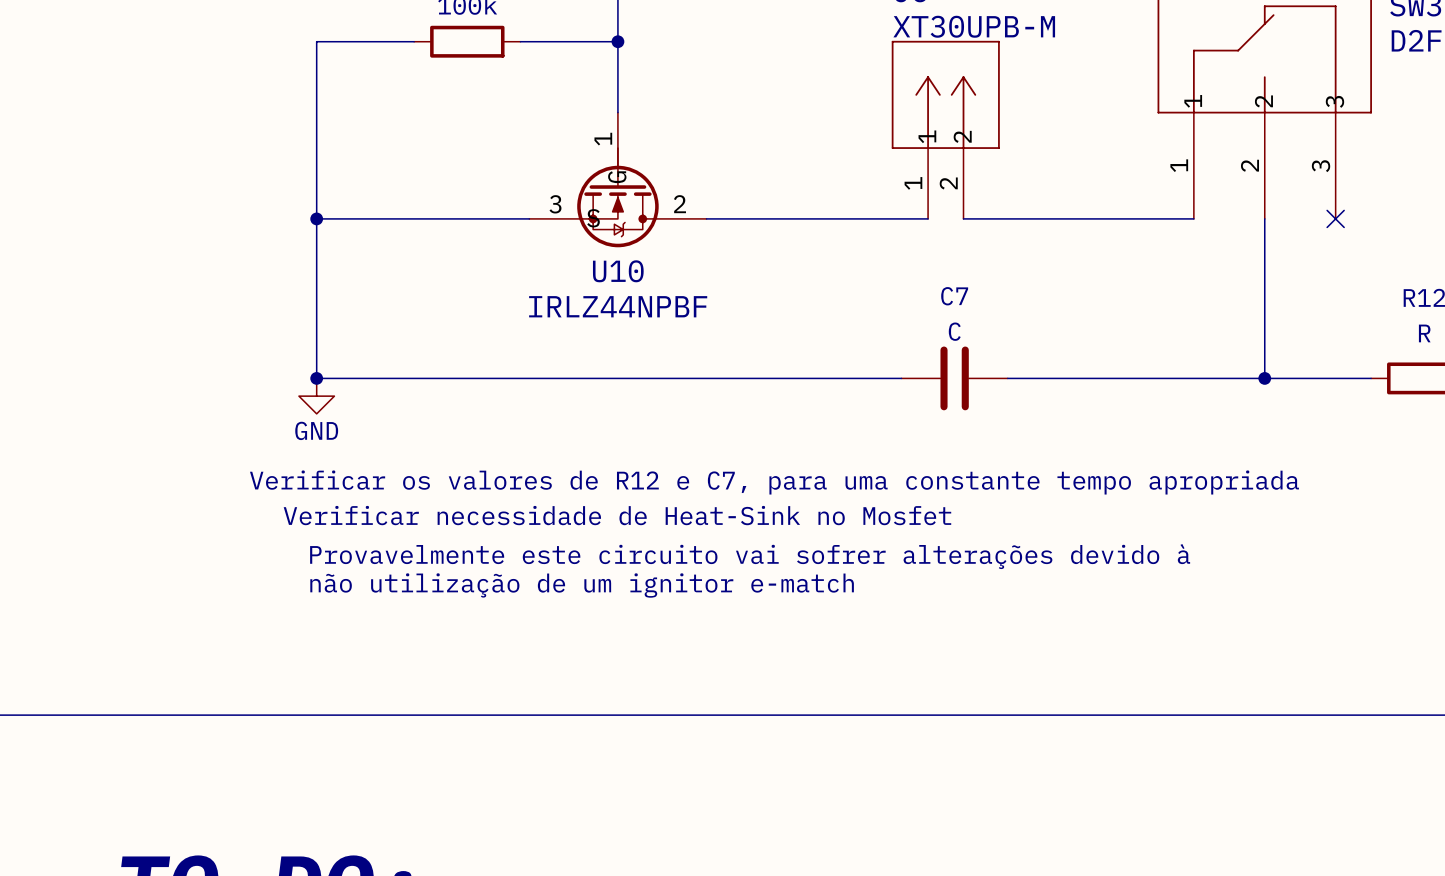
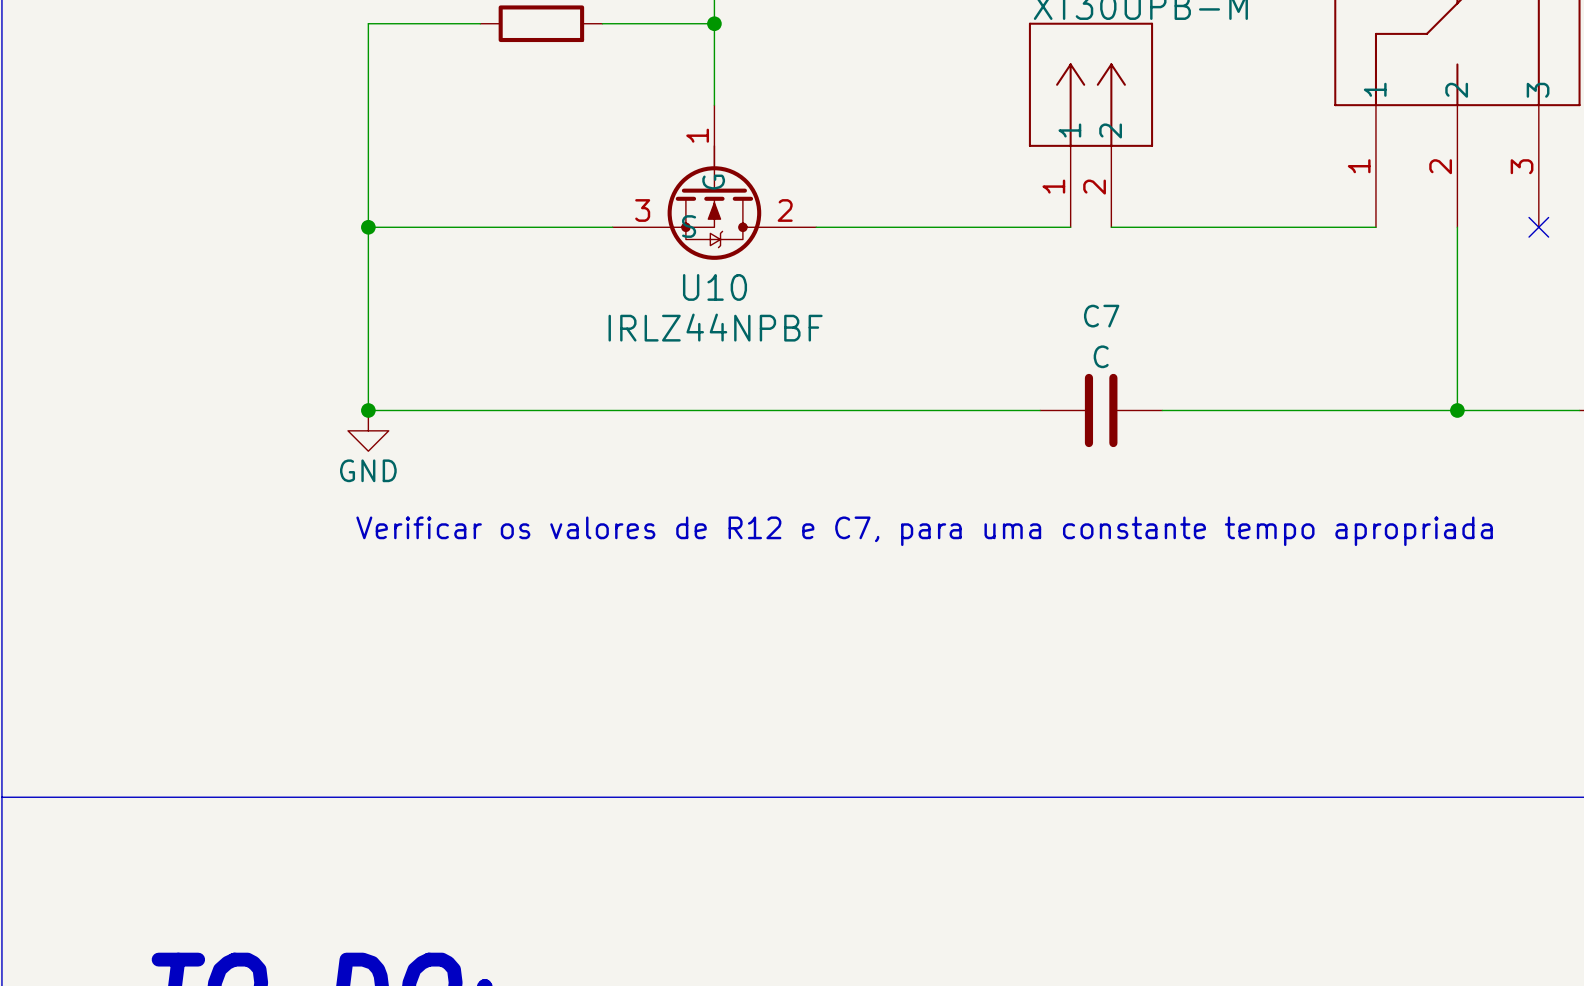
text: Verificar necessidade de Heat-Sink no Mosfet (617, 515) -> none
text: Provavelmente este circuito vai sofrer alterações devido à (750, 556) -> none
text: não utilização de um ignitor e-match (582, 585) -> none

